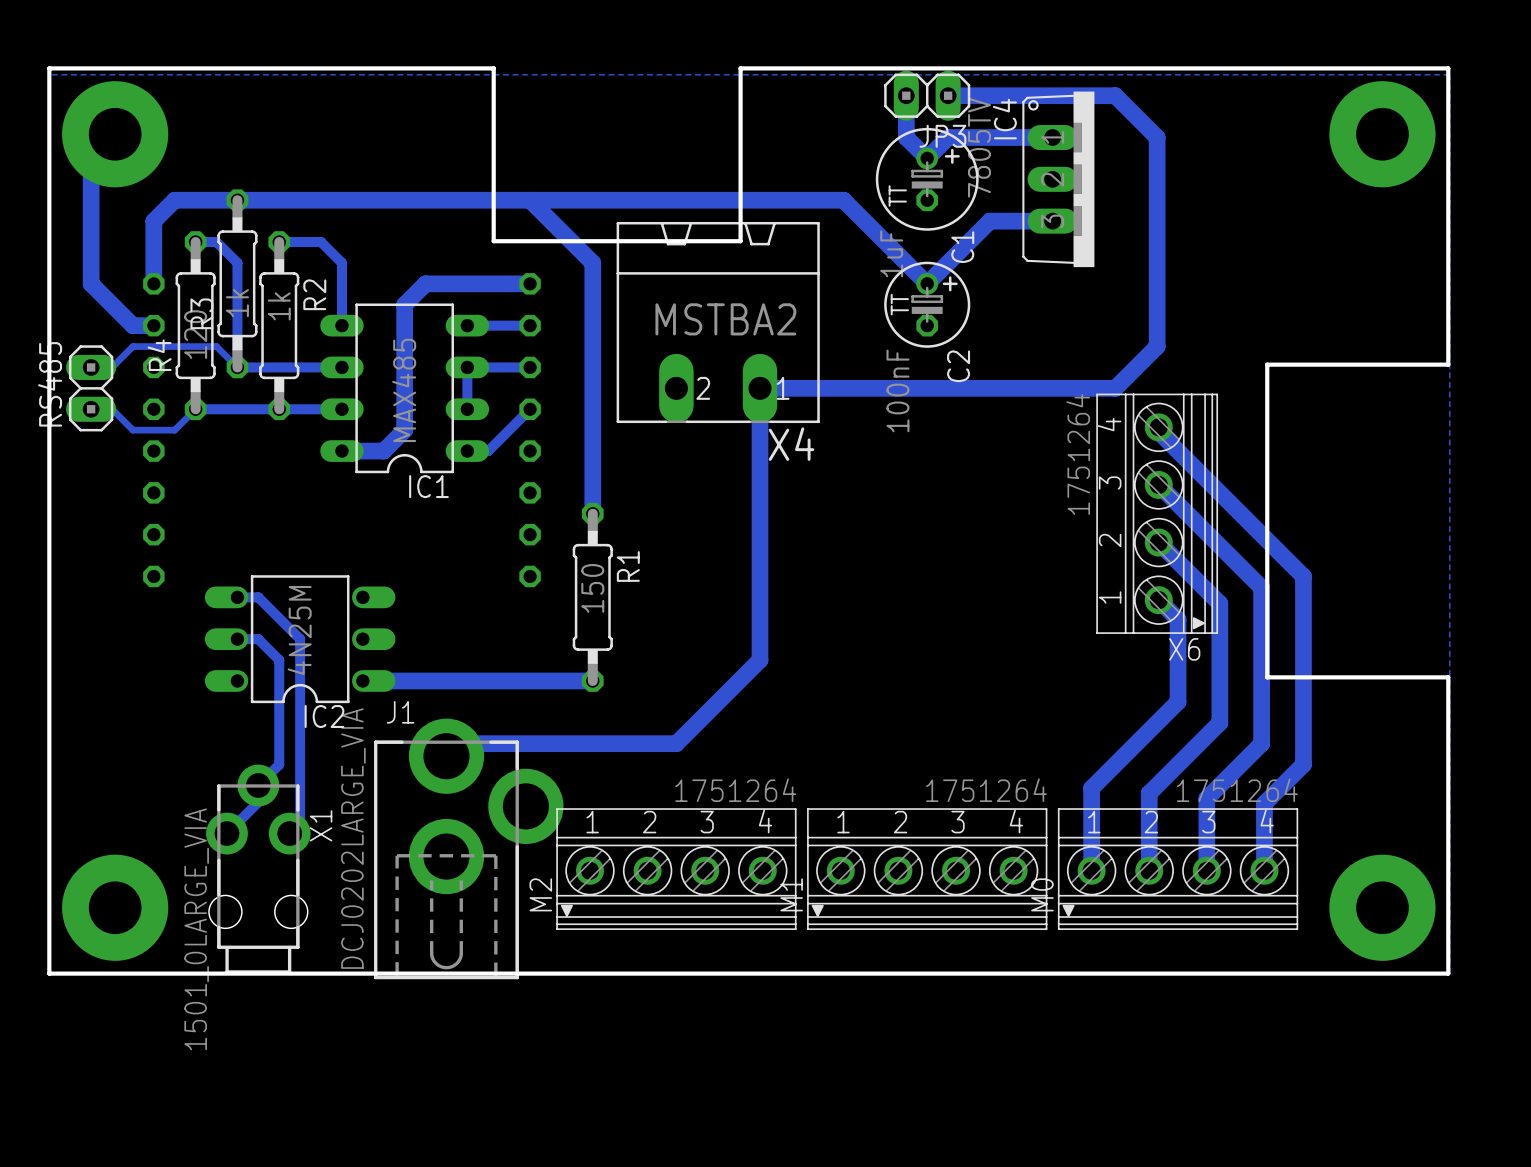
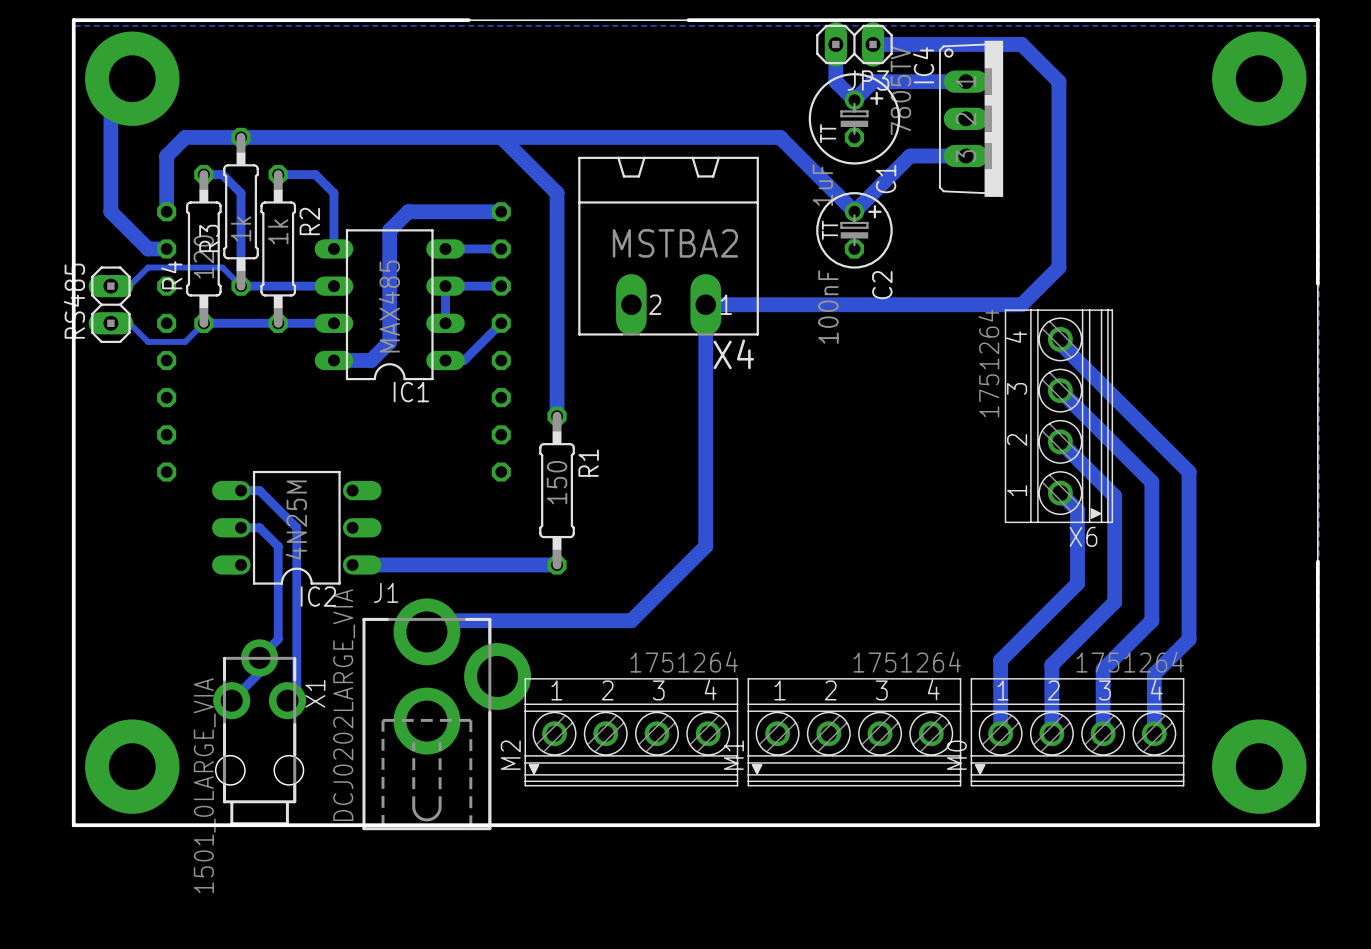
board edge: (493, 68) (493, 241) (740, 241) (740, 68) -> (468, 20) (688, 20)
board edge: (1448, 364) (1267, 364) (1267, 677) (1448, 677) -> (1317, 283) (1317, 561)

